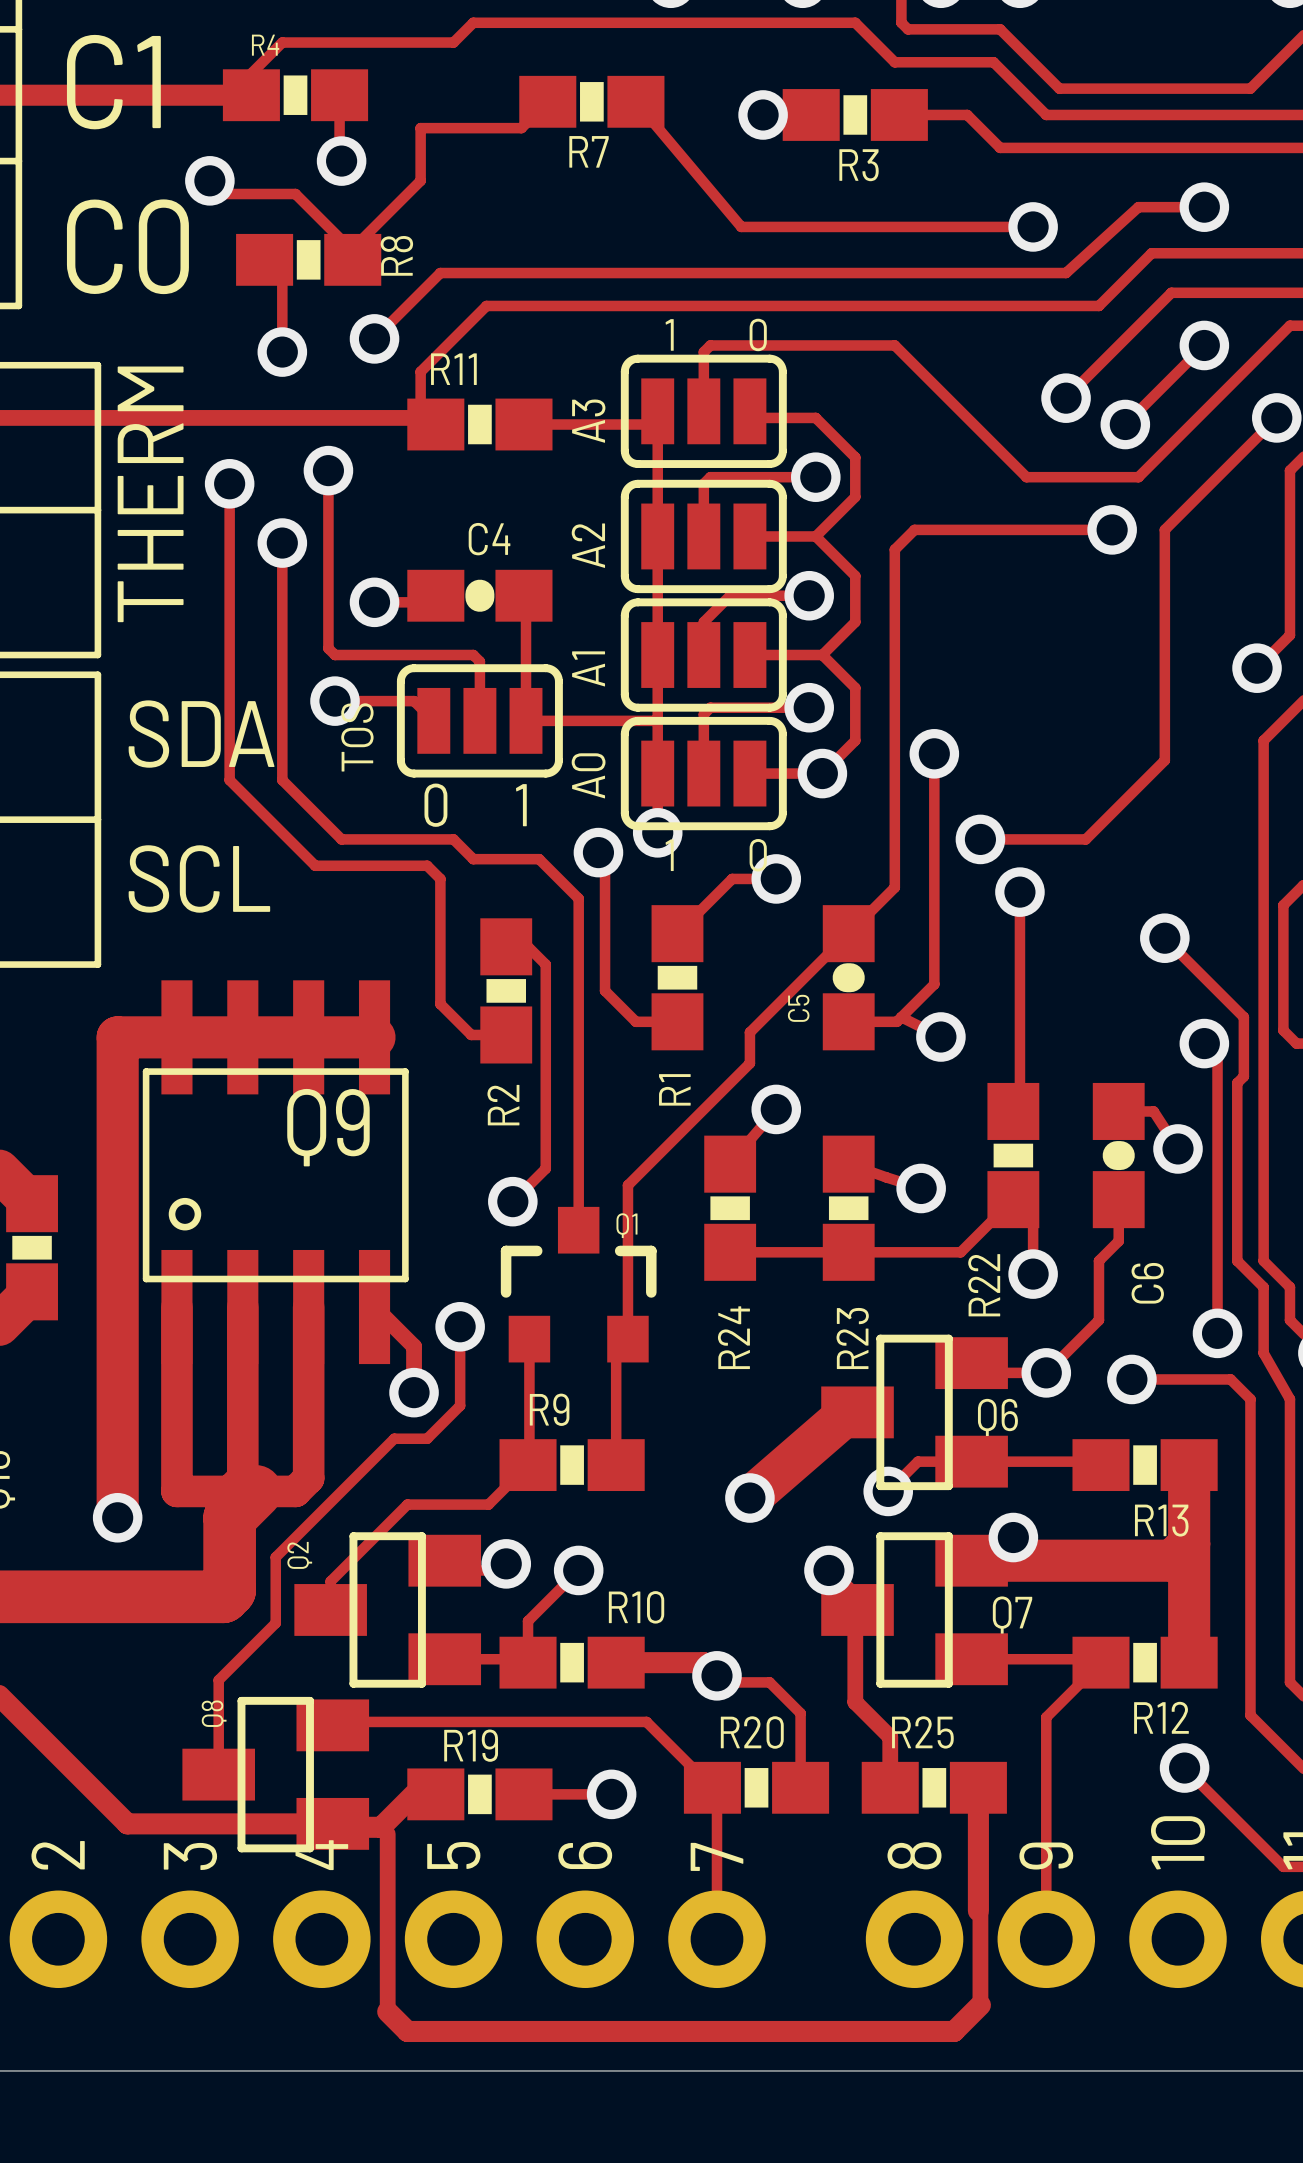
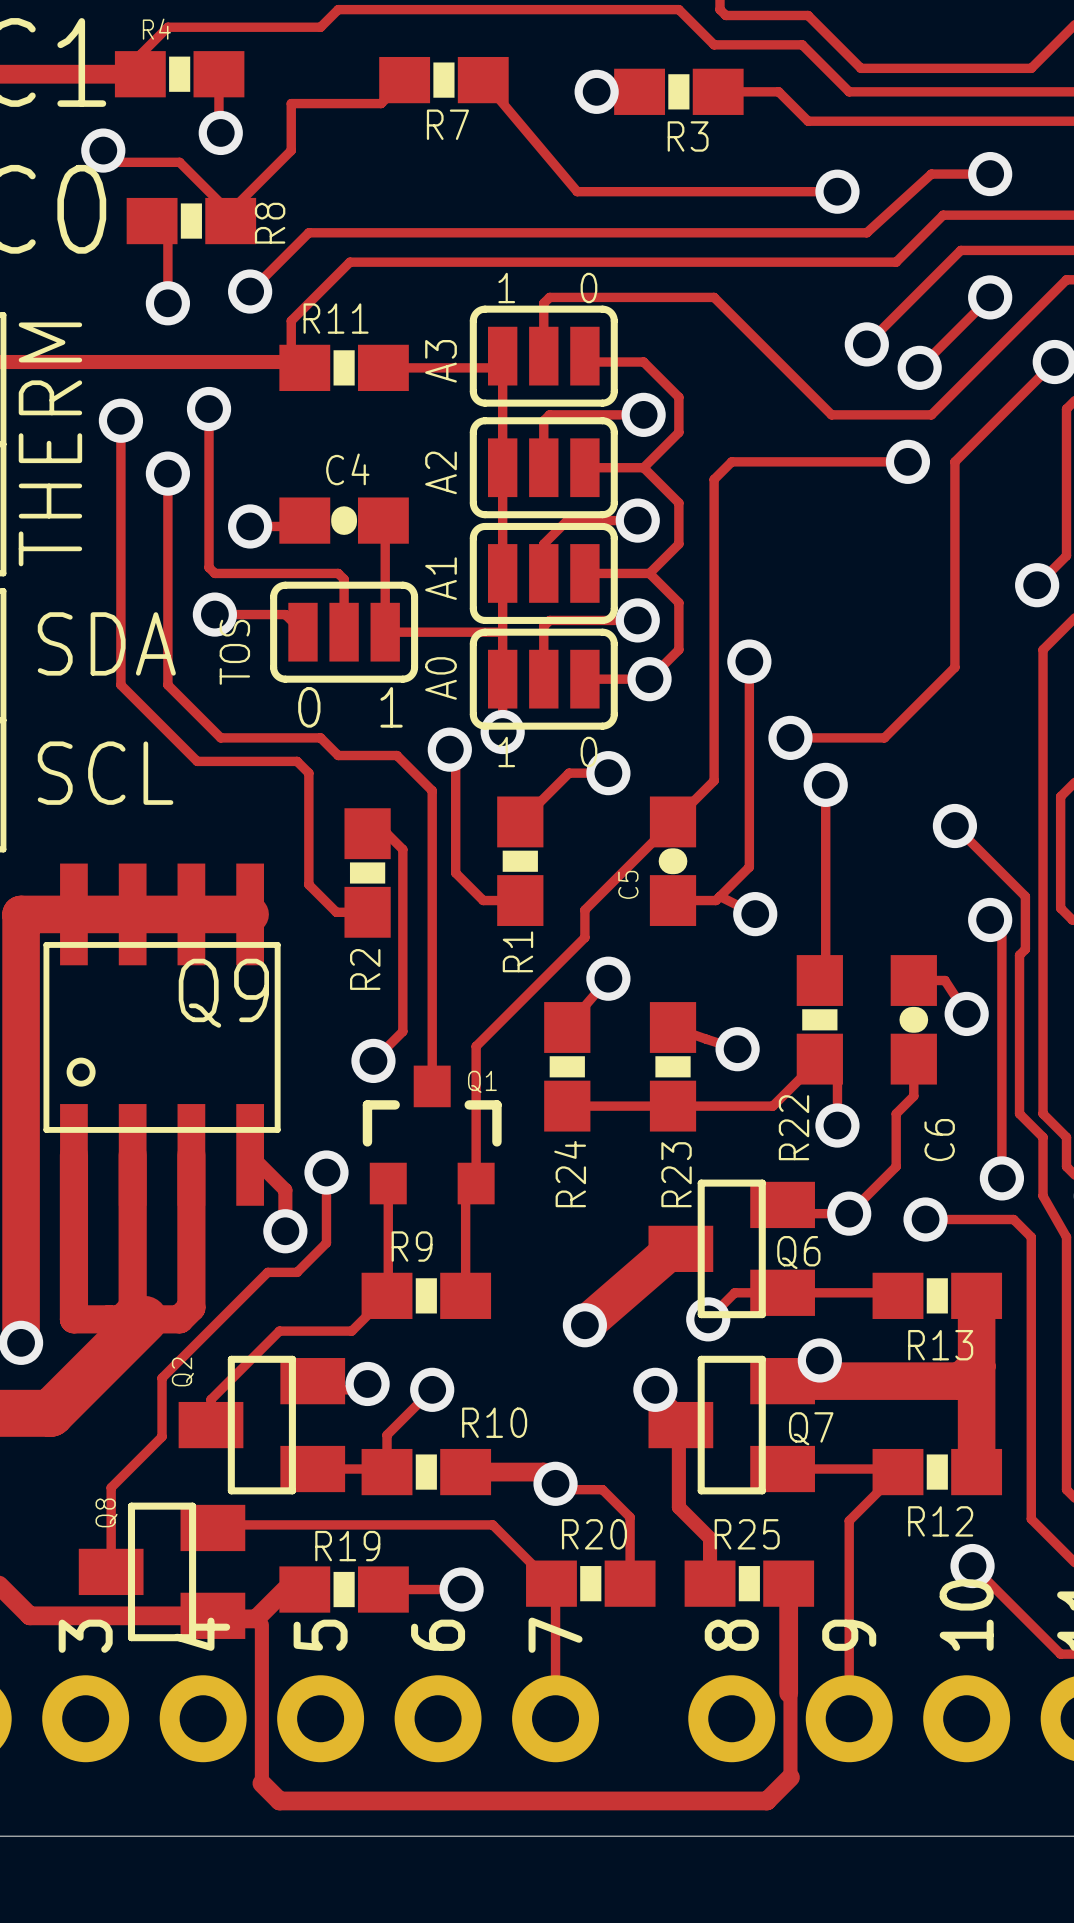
track: (229, 1517) (229, 1590) (223, 1596) (150, 1596) -> (120, 1342) (50, 1413)

